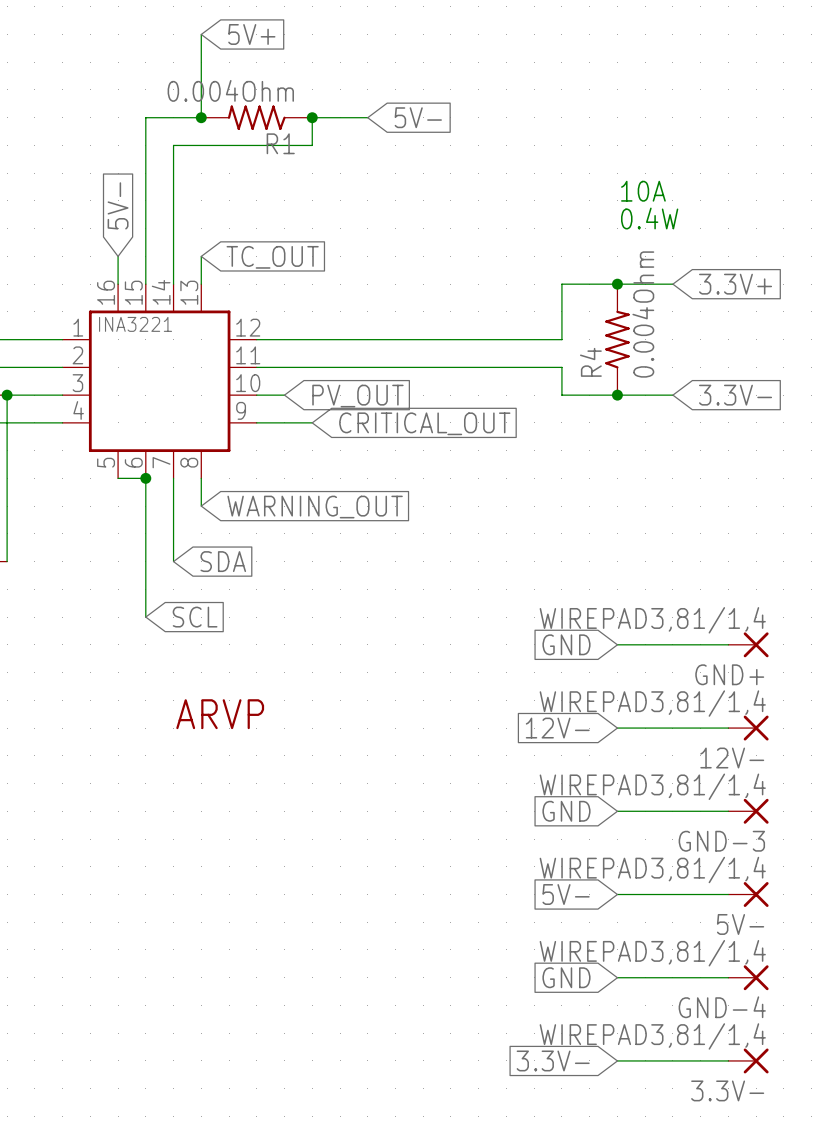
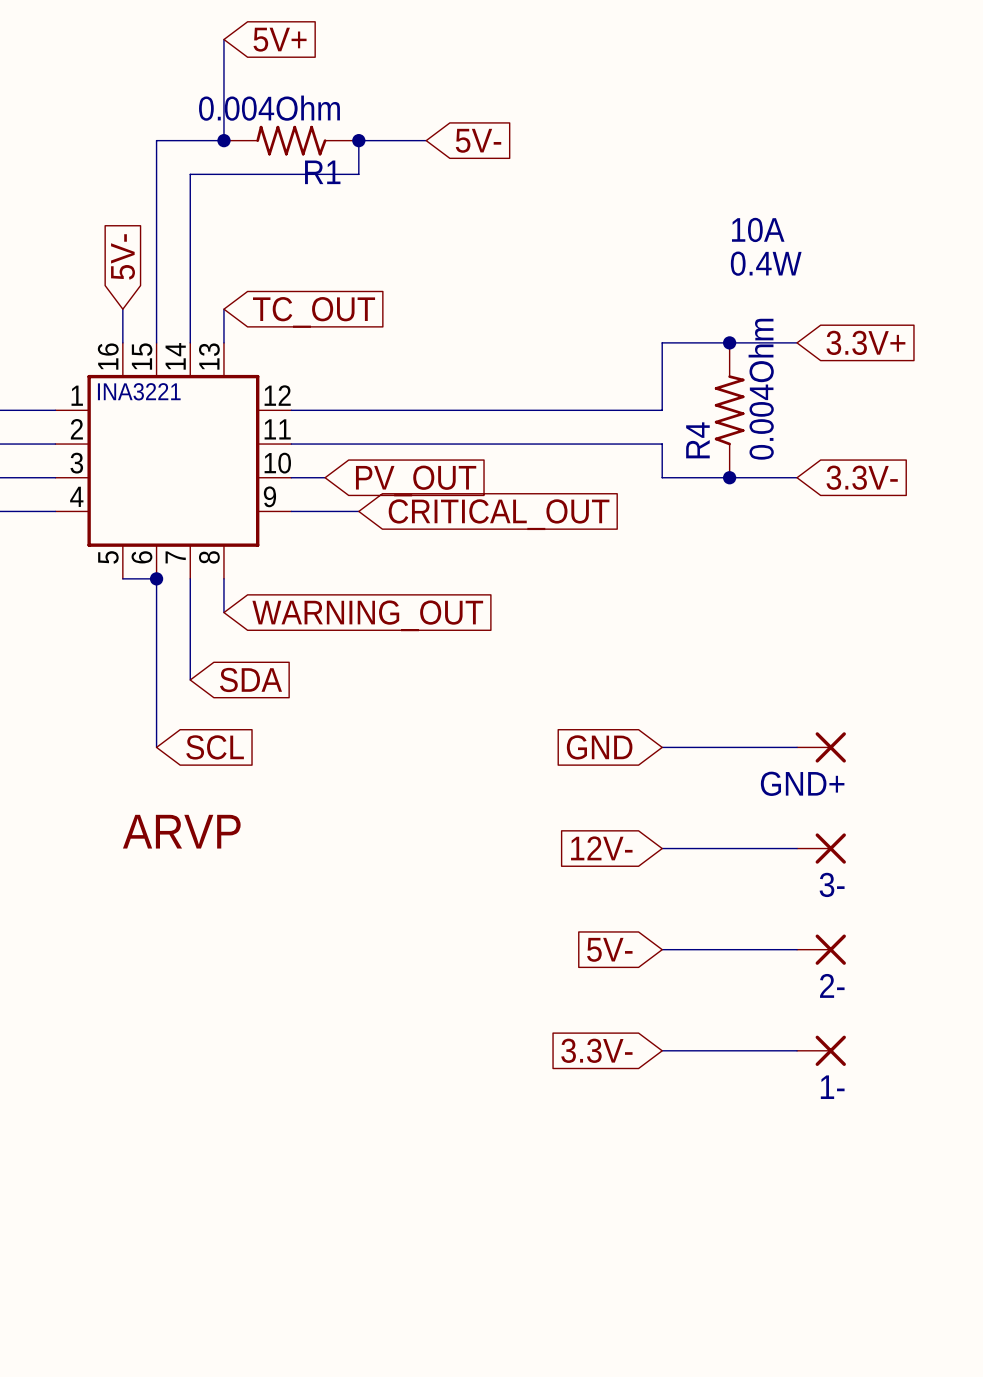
GND+: none -> (821, 747)
global label position: GND (566, 644) -> GND (599, 747)
wire: (617, 644) (728, 644) -> (662, 747) (797, 747)
GND+: WIREPAD3,81/1,4 (748, 644) -> none
3-: none -> (821, 848)
part position: (220, 714) -> (181, 831)
global label position: 12V- (557, 728) -> 12V- (601, 848)
wire: (617, 728) (728, 728) -> (662, 848) (797, 848)
12V-: WIREPAD3,81/1,4 (748, 728) -> none
2-: none -> (821, 949)
global label: GND (566, 811) -> none
wire: (617, 811) (728, 811) -> (662, 949) (797, 949)
GND-3: WIREPAD3,81/1,4 (748, 811) -> none
1-: none -> (821, 1050)
global label position: 5V- (566, 894) -> 5V- (609, 949)
wire: (617, 894) (728, 894) -> (662, 1050) (797, 1050)
5V-: WIREPAD3,81/1,4 (748, 894) -> none
global label: GND (566, 977) -> none
wire: (617, 977) (728, 977) -> none
GND-4: WIREPAD3,81/1,4 (748, 977) -> none
global label position: 3.3V- (553, 1060) -> 3.3V- (596, 1050)
wire: (617, 1060) (728, 1060) -> none
3.3V-: WIREPAD3,81/1,4 (748, 1060) -> none

